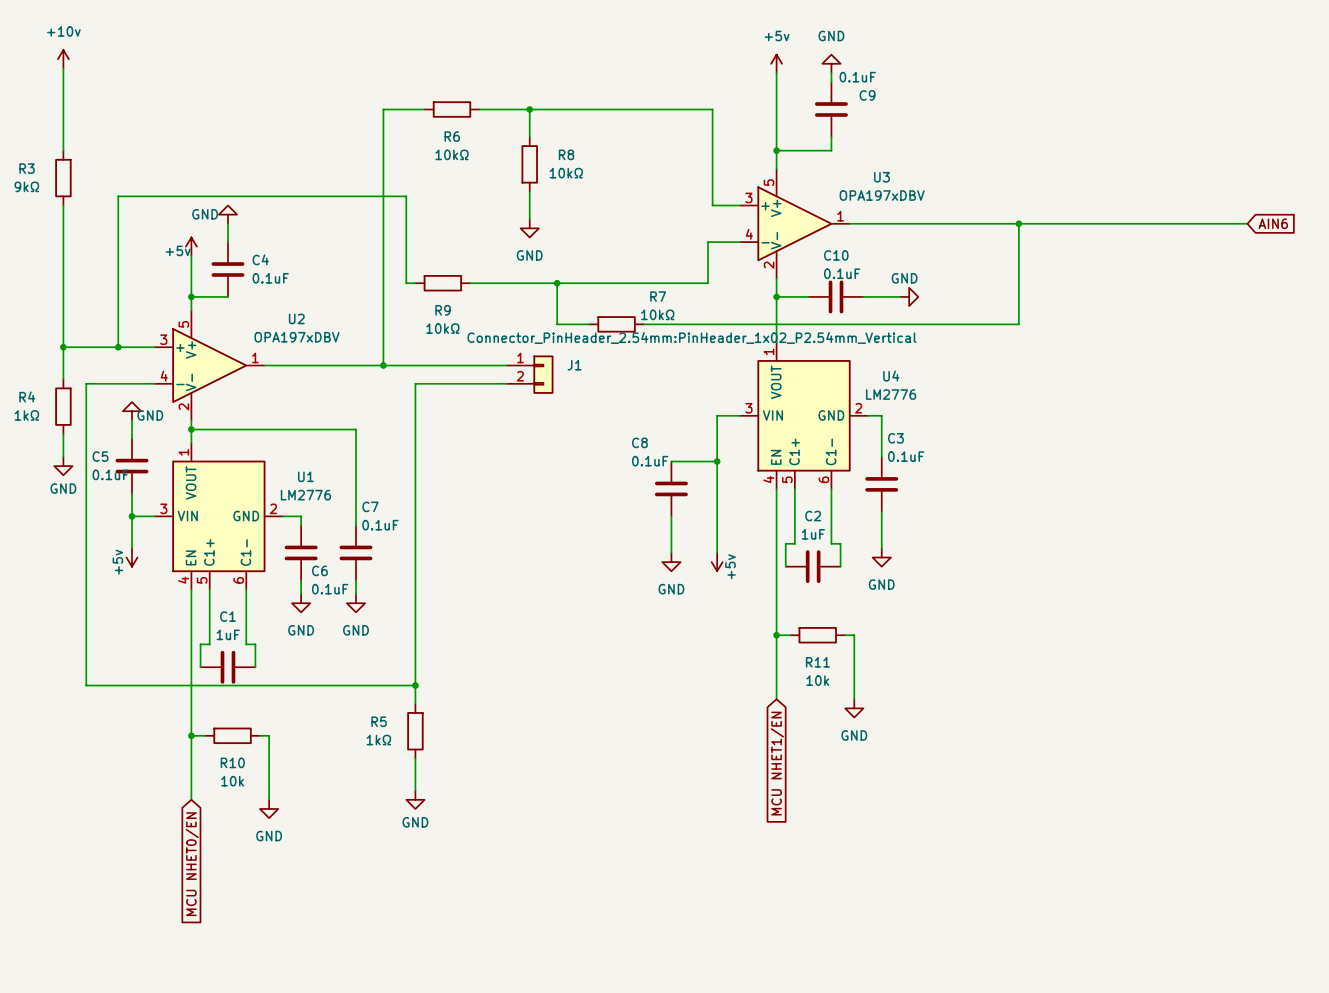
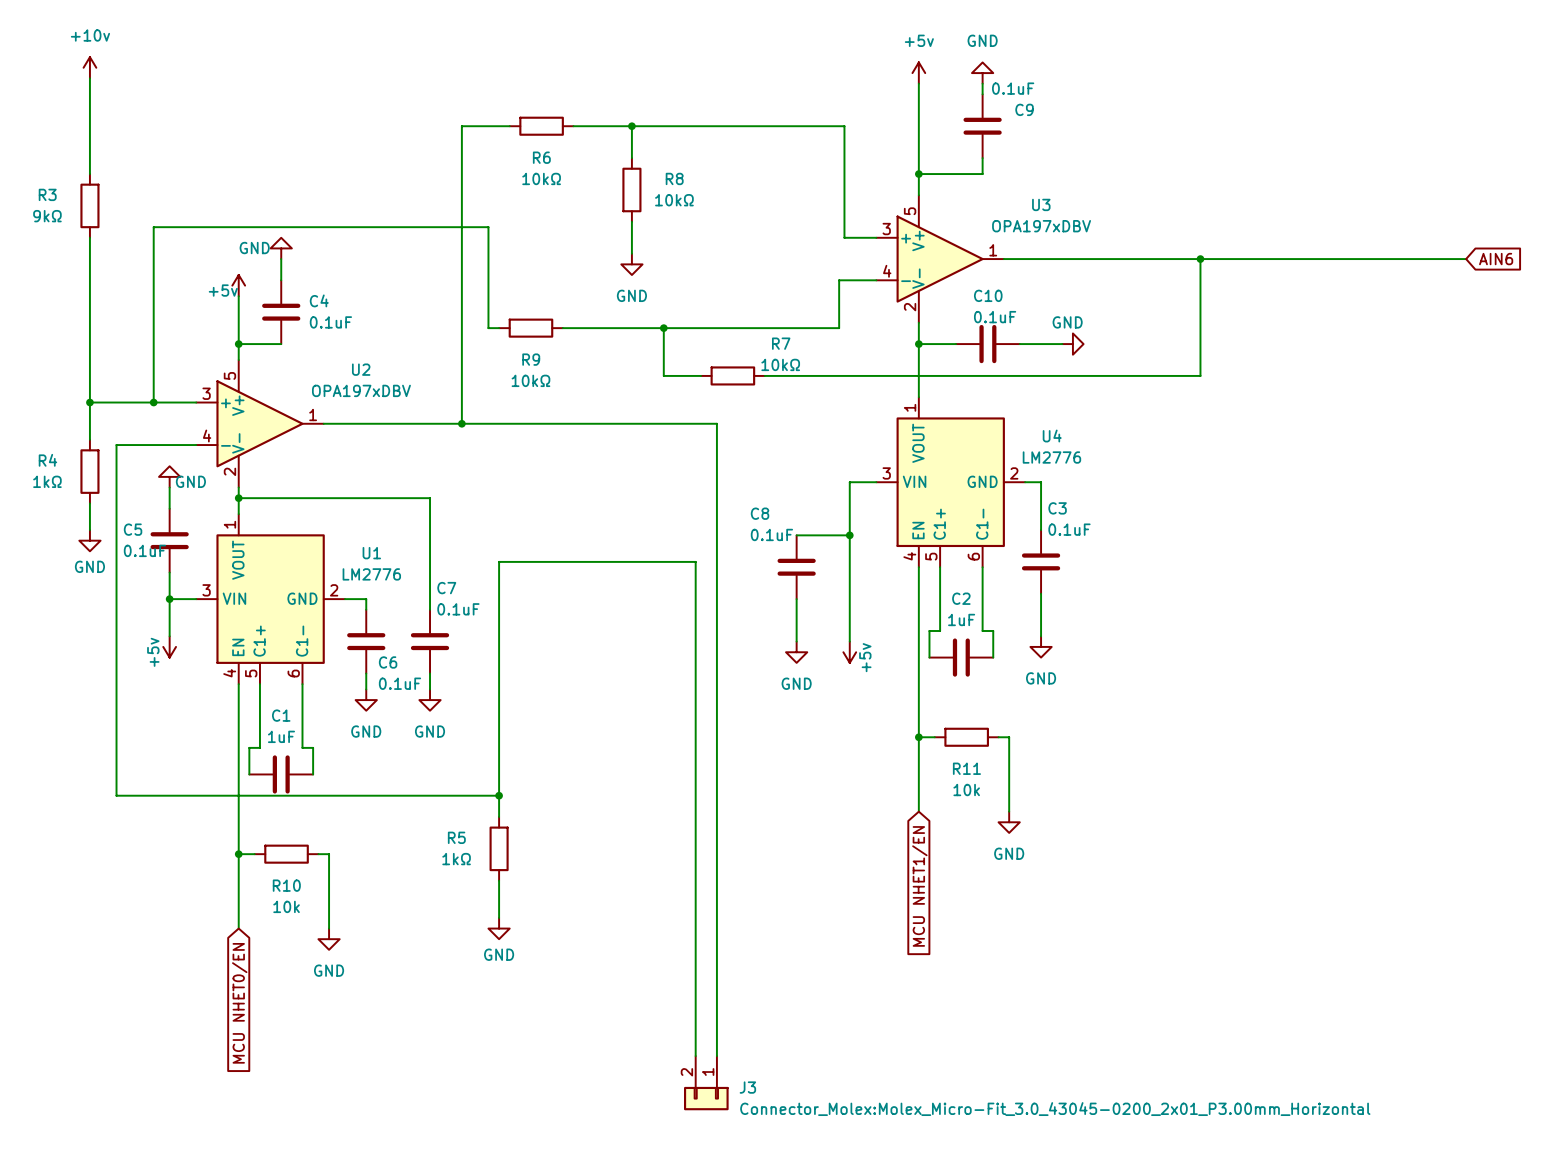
wire: none -> (605, 423) (716, 423) (716, 1056)
J1: Connector_PinHeader_2.54mm:PinHeader_1x02_P2.54mm_Vertical (530, 374) -> none
wire: (506, 383) (415, 383) (415, 484) -> (695, 1056) (695, 561) (499, 561)
J3: none -> Connector_Molex:Molex_Micro-Fit_3.0_43045-0200_2x01_P3.00mm_Horizontal (706, 1083)

